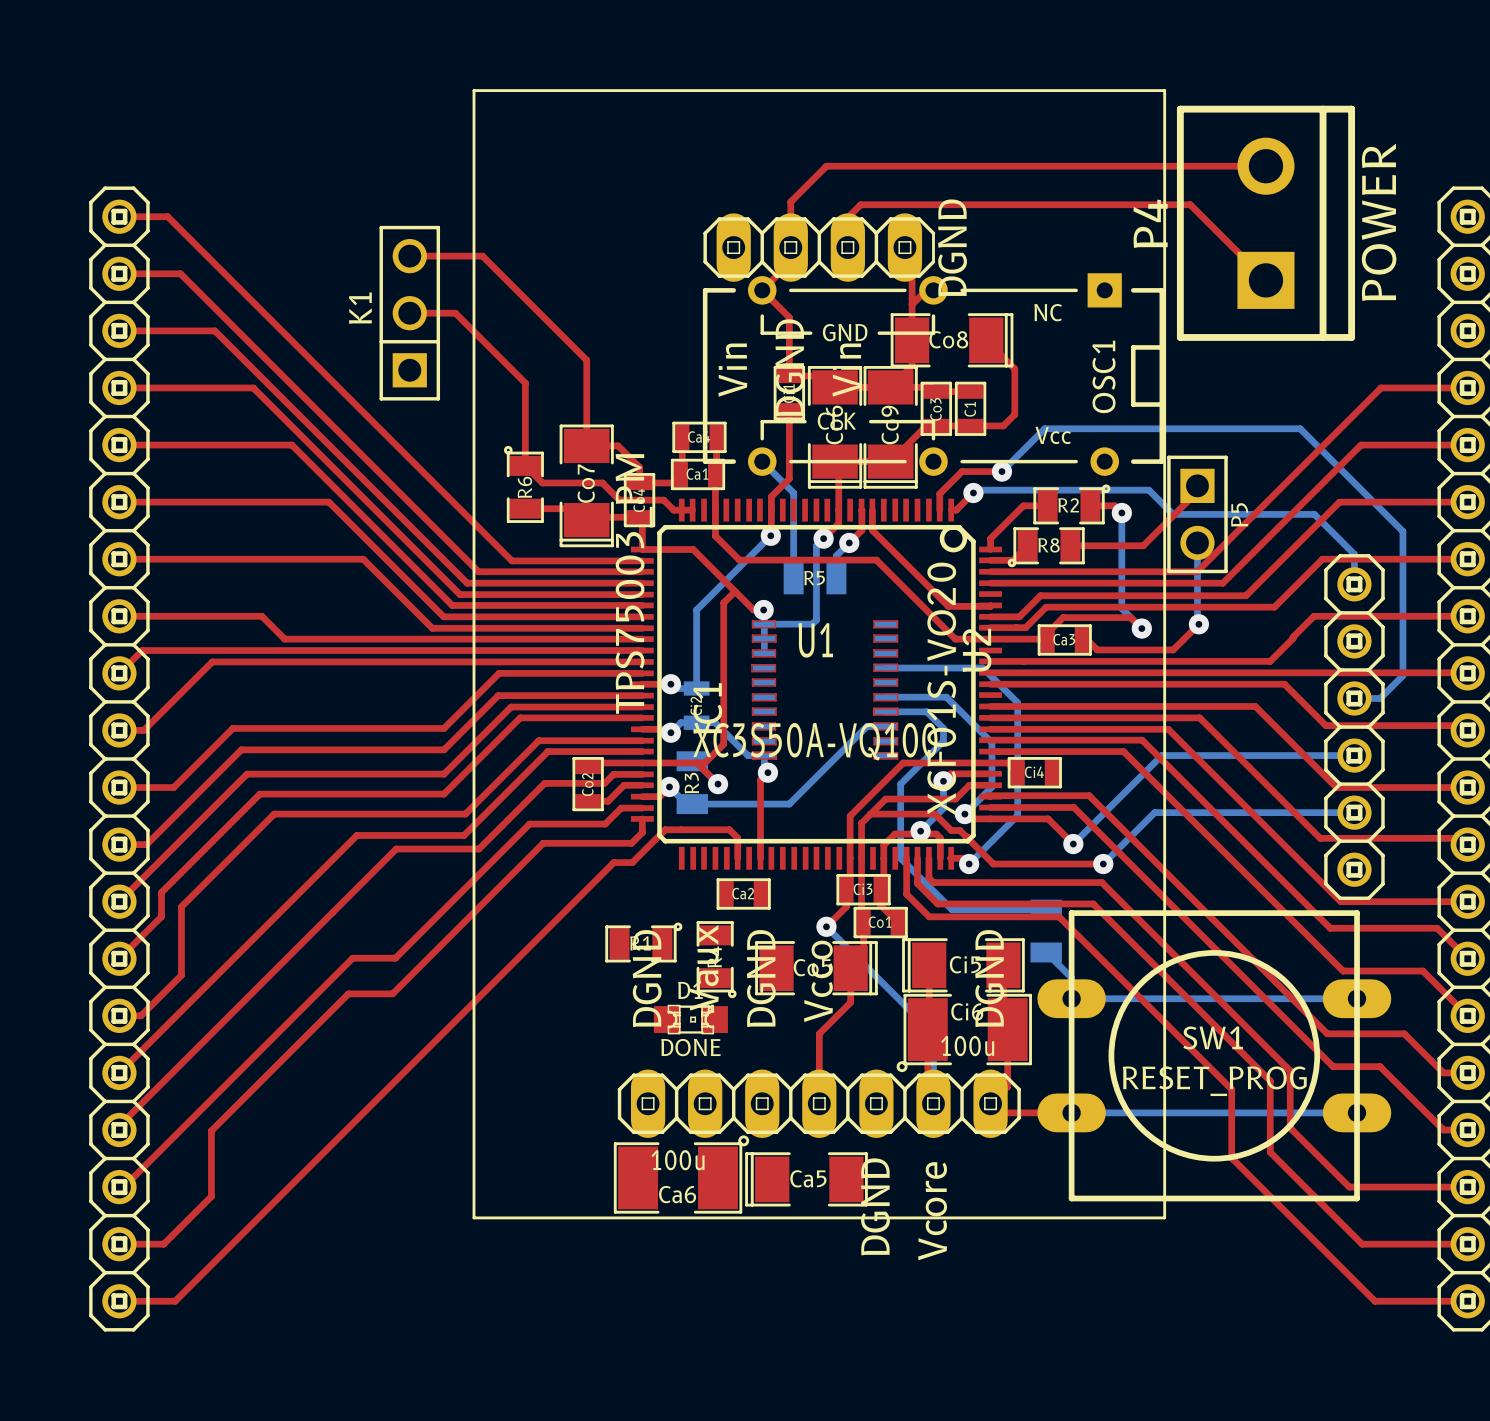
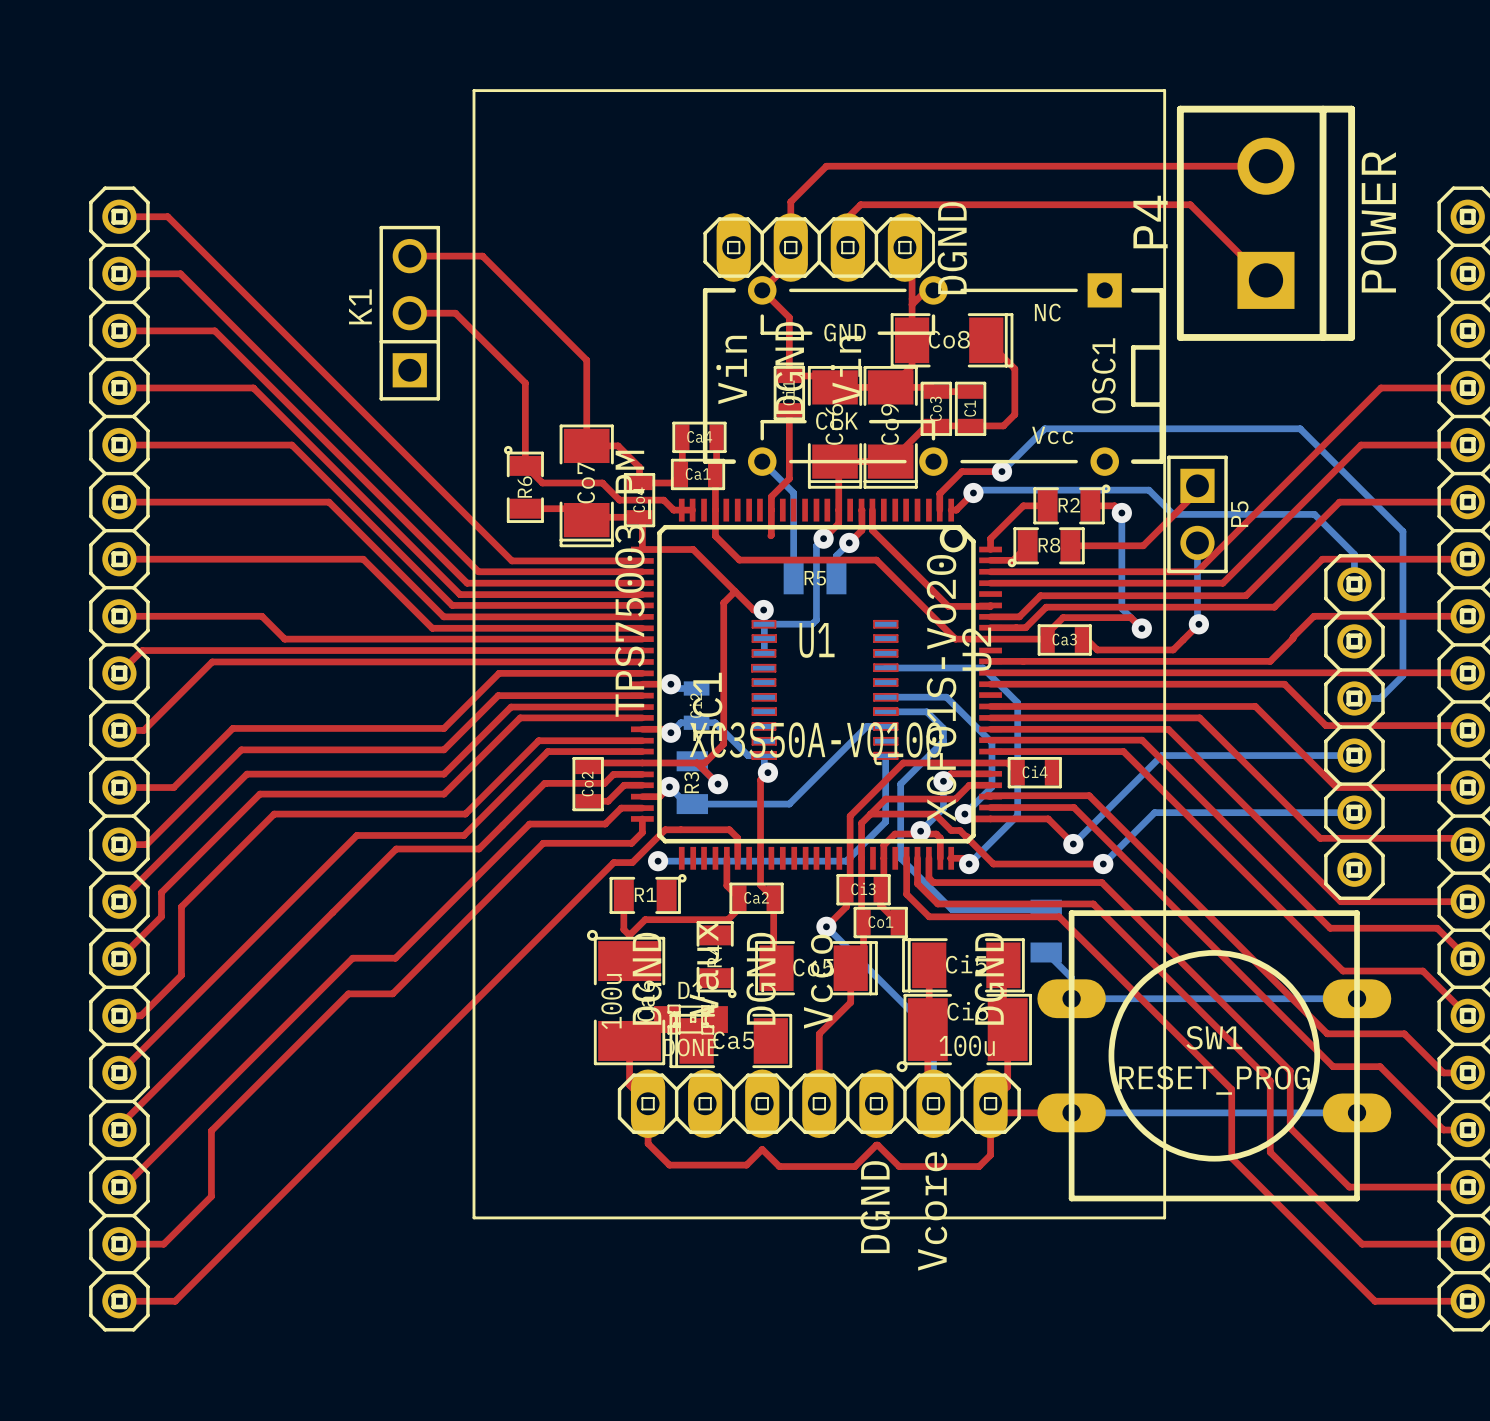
bottom track: (770, 535) (696, 610) (696, 688) -> none
via: (770, 535) -> none
bottom track: none -> (885, 755) (885, 821) (846, 861) (658, 861)
top track: none -> (726, 858) (726, 885) (739, 898) (739, 908) (728, 919) (645, 919) (629, 935) (623, 929) (623, 895)
top track: none -> (760, 858) (760, 885) (773, 898) (773, 965) (776, 968)
via: none -> (658, 861)
Ca2 position: (743, 893) -> (756, 898)
R1 position: (643, 942) -> (648, 893)
top track: none -> (629, 1040) (629, 1085) (648, 1103) (648, 1143) (669, 1165) (746, 1165) (762, 1149) (779, 1166) (855, 1166) (877, 1145) (899, 1166) (979, 1166) (990, 1155) (990, 1103)
Ca6 rotation: 0° (681, 1174) -> 90° counterclockwise (626, 997)
Ca6 position: (681, 1174) -> (626, 997)
Ca5 position: (806, 1179) -> (730, 1040)

